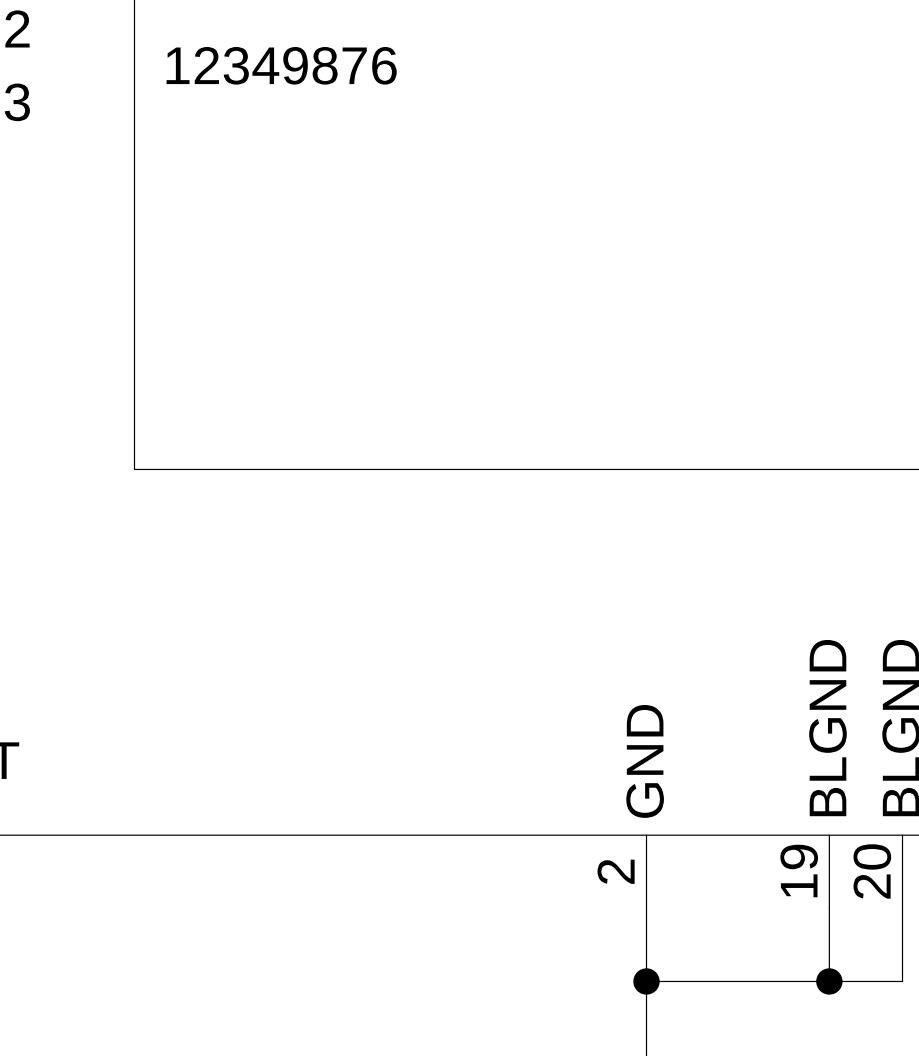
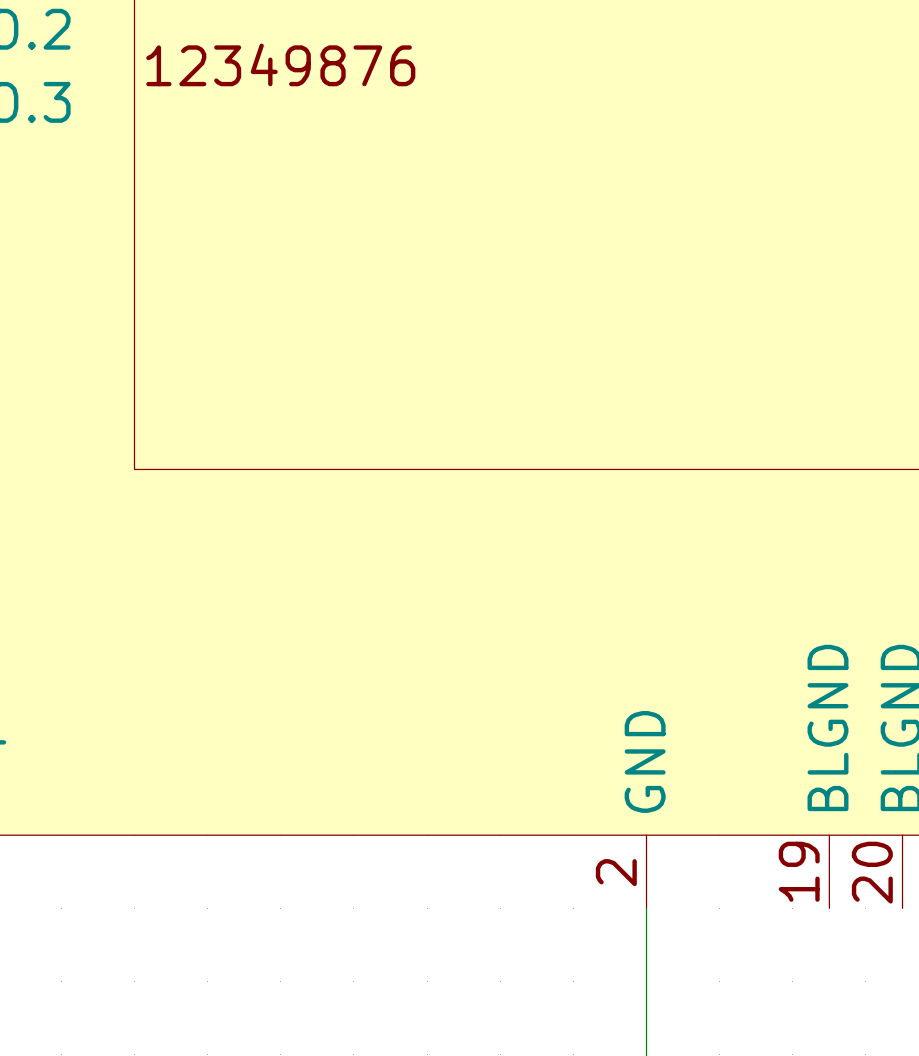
wire: (829, 908) (829, 981) -> none
wire: (902, 908) (902, 981) (646, 981) -> none
junction: (646, 981) -> none
junction: (829, 981) -> none

